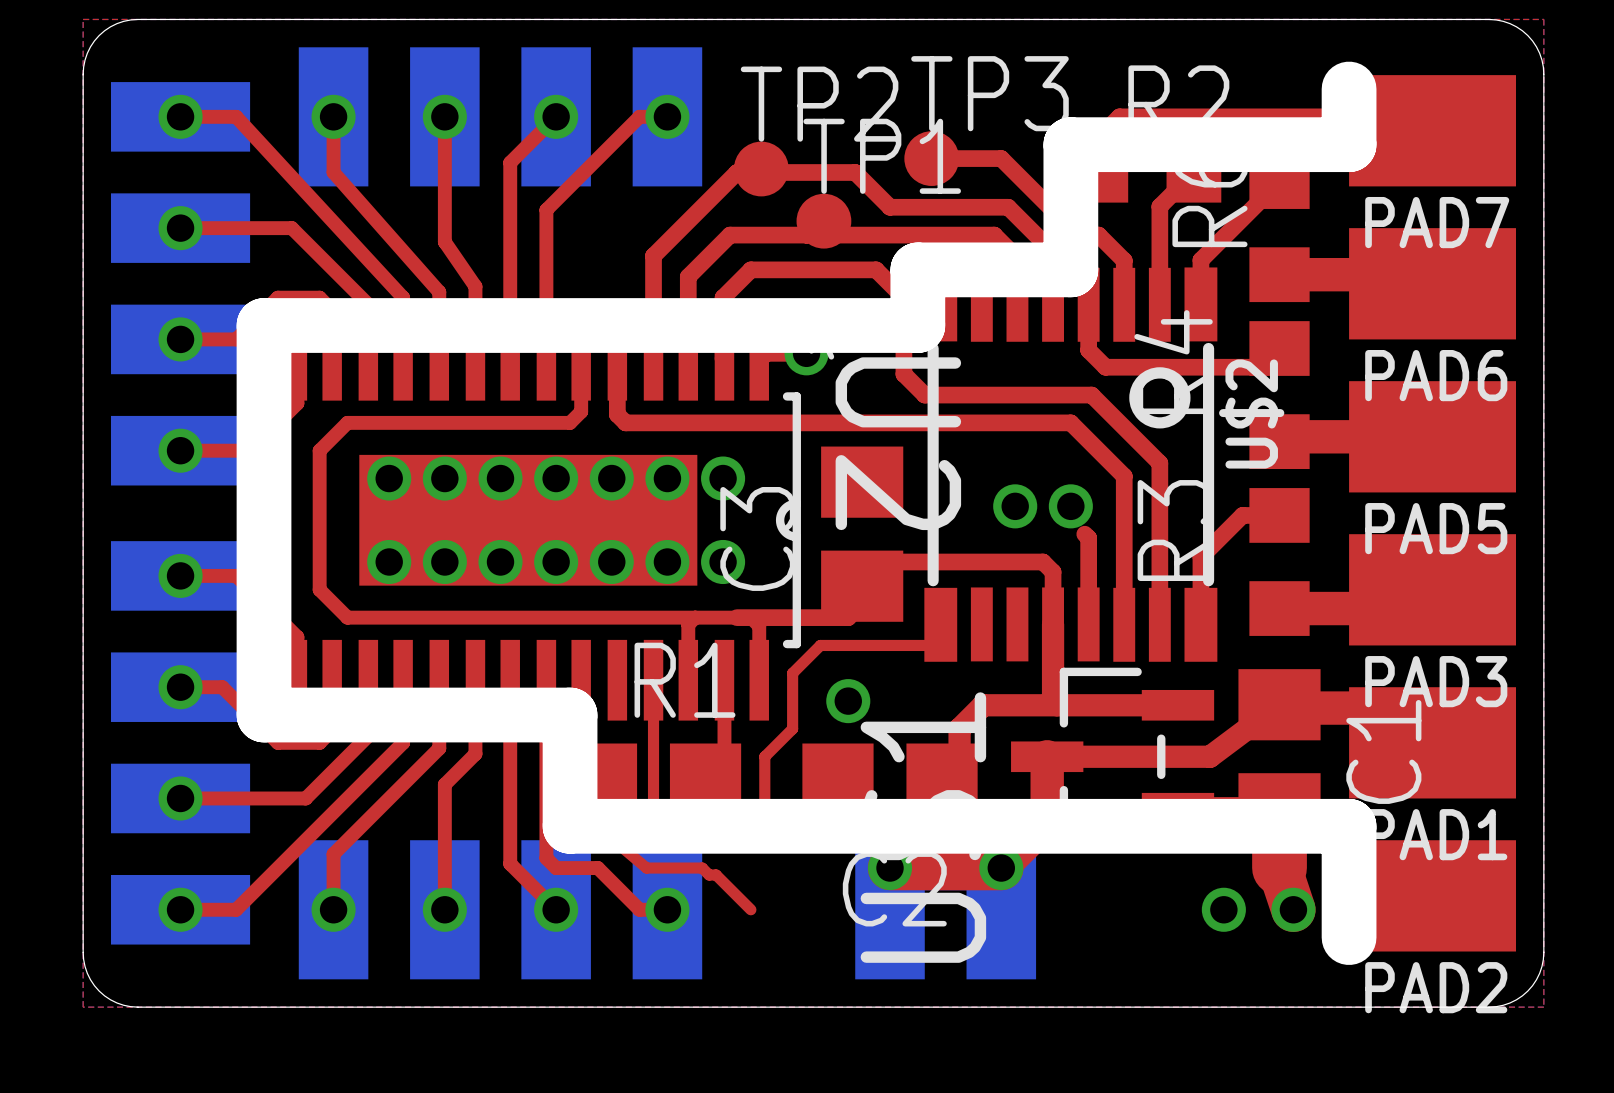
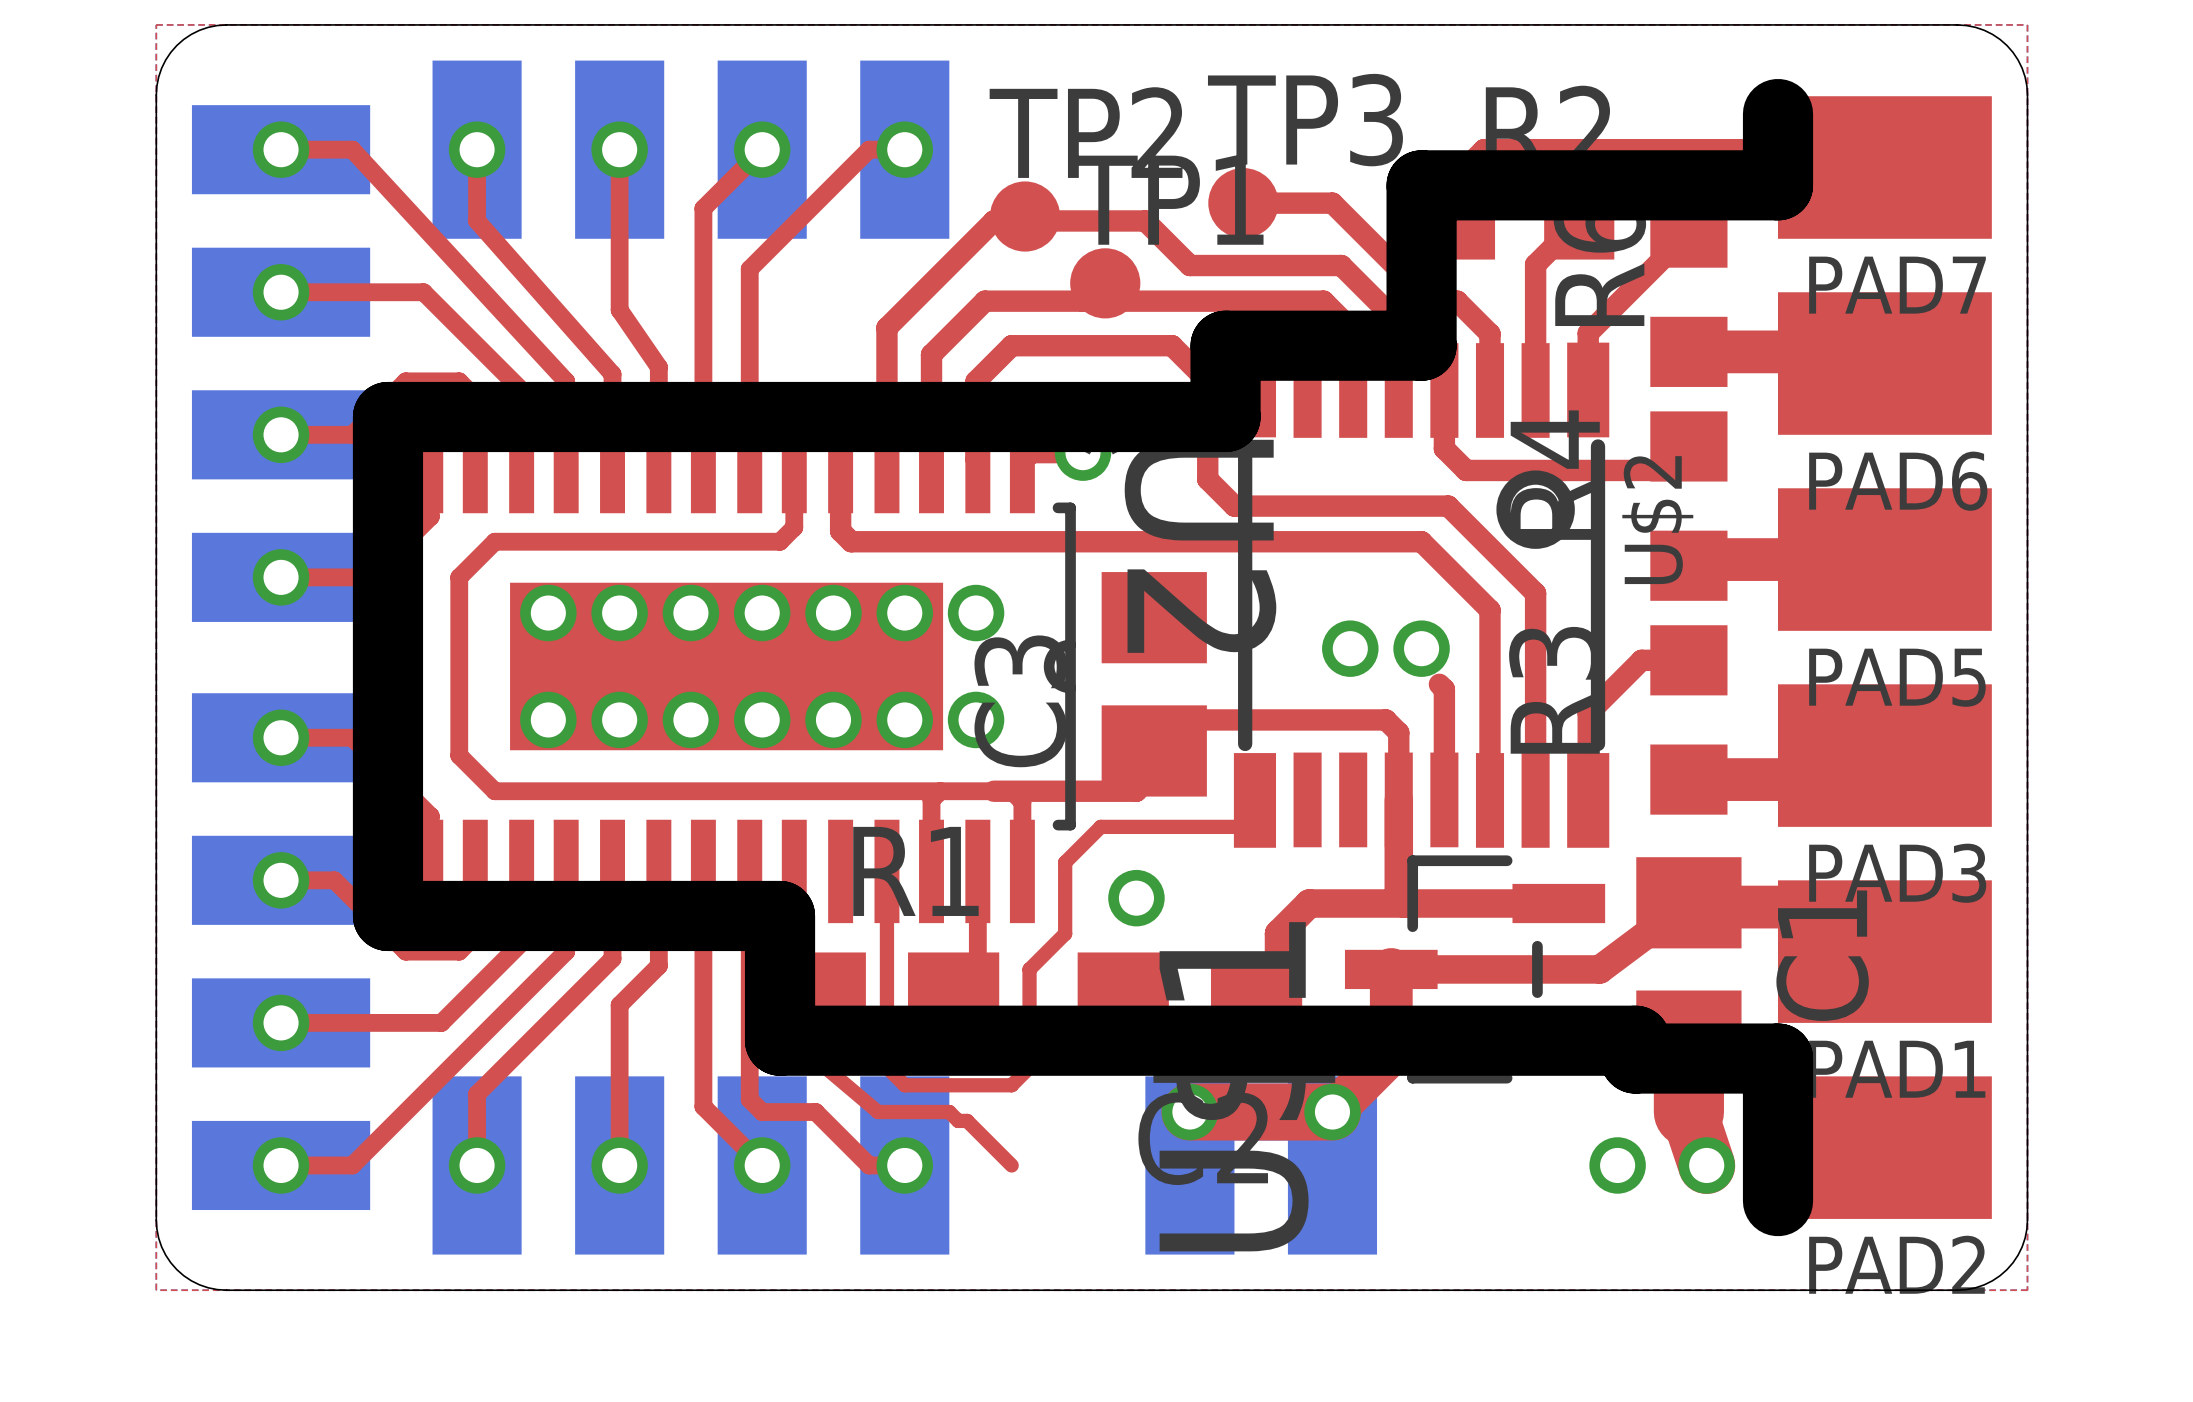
board edge: (570, 812) (570, 826) (1237, 826) -> (780, 1040) (1635, 1040) (1635, 1058)

